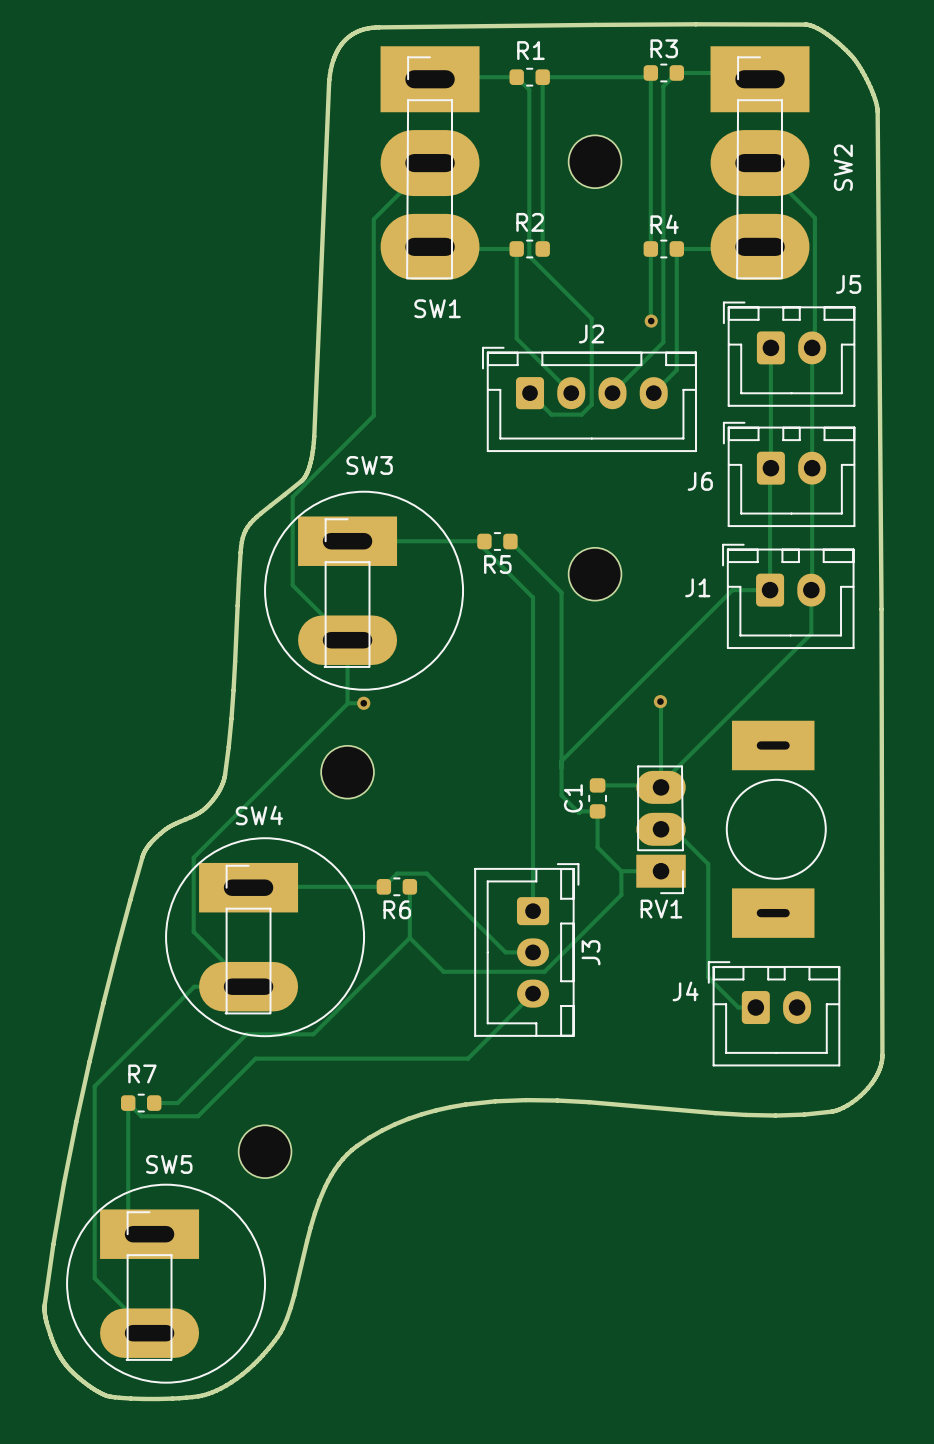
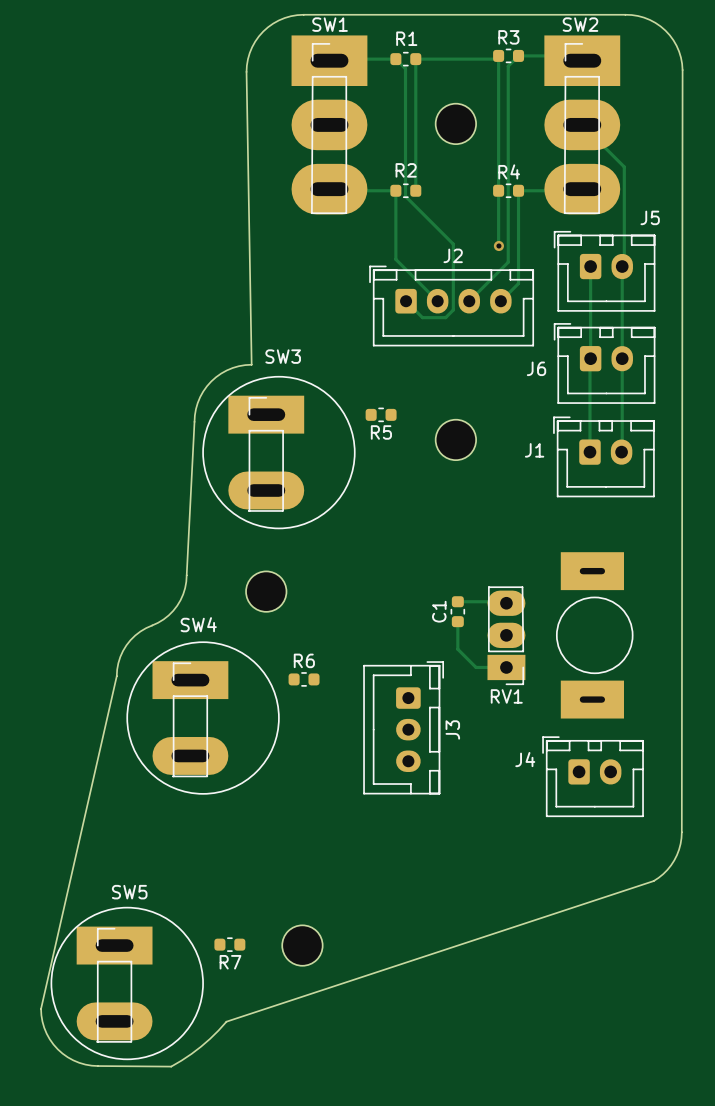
board edge: (695, 24) (375, 27) (362, 29) (350, 35) (341, 44) (335, 55) (329, 84) (314, 436) (310, 462) (302, 480) (256, 516) (244, 533) (240, 552) (231, 718) (224, 779) (217, 794) (205, 808) (165, 829) (150, 842) (143, 855) (89, 1061) (53, 1244) (44, 1308) (51, 1338) (59, 1355) (70, 1370) (88, 1385) (105, 1395) (143, 1398) (201, 1395) (226, 1385) (253, 1364) (277, 1336) (287, 1318) (314, 1213) (331, 1175) (352, 1150) (369, 1137) (395, 1124) (422, 1114) (450, 1107) (495, 1101) (526, 1100) (589, 1102) (745, 1114) (804, 1114) (831, 1111) (843, 1107) (856, 1099) (868, 1088) (878, 1072) (882, 1055) (881, 609) (876, 105) (868, 82) (854, 58) (833, 39) (814, 26) (805, 24) (695, 24) -> (303, 14) (284, 17) (268, 27) (255, 41) (247, 59) (246, 71) (251, 364) (232, 367) (216, 377) (206, 386) (197, 403) (194, 415) (185, 588) (180, 600) (173, 610) (163, 619) (135, 635) (126, 645) (120, 656) (41, 1008) (44, 1027) (53, 1044) (67, 1057) (85, 1064) (171, 1066) (200, 1046) (226, 1021) (653, 881) (671, 865) (680, 844) (682, 70) (676, 45) (660, 26) (644, 17) (631, 15) (303, 14)
track: (430, 163) (373, 219) (373, 415) (292, 496) (292, 585) (347, 640) (347, 703) -> none
SW2 name rotation: 0° (843, 167) -> 90° clockwise (580, 24)
SW2 name position: SW2 (843, 167) -> SW2 (580, 24)
SW1 name position: SW1 (437, 308) -> SW1 (330, 24)
track: (347, 541) (484, 541) (484, 549) (533, 597) (533, 911) -> none
track: (510, 541) (561, 592) (561, 795) (579, 813) (580, 811) (597, 811) -> none
track: (770, 590) (732, 590) (561, 761) -> none
track: (811, 590) (811, 633) (661, 783) -> none
track: (660, 701) (661, 787) -> none
via: (660, 701) -> none
track: (363, 703) (348, 703) (193, 857) (193, 931) (248, 986) (194, 986) (94, 1086) (94, 1278) (149, 1333) -> none
via: (363, 703) -> none
track: (661, 829) (673, 829) (708, 864) (708, 977) (738, 1007) (755, 1007) -> none
track: (621, 871) (621, 894) (544, 971) (443, 971) (409, 937) -> none
track: (409, 886) (409, 937) -> none
track: (248, 887) (383, 886) (397, 873) (426, 873) (505, 952) (533, 952) -> none
R6 name position: R6 (397, 909) -> R6 (304, 660)
track: (409, 937) (313, 1034) (246, 1034) (177, 1103) (154, 1103) -> none
track: (533, 993) (468, 1058) (255, 1058) (198, 1116) (141, 1116) (128, 1103) (128, 1212) (149, 1234) -> none
R7 name position: R7 (142, 1073) -> R7 (230, 962)
R7 position: (141, 1103) -> (229, 944)
part position: (265, 1151) -> (302, 945)

